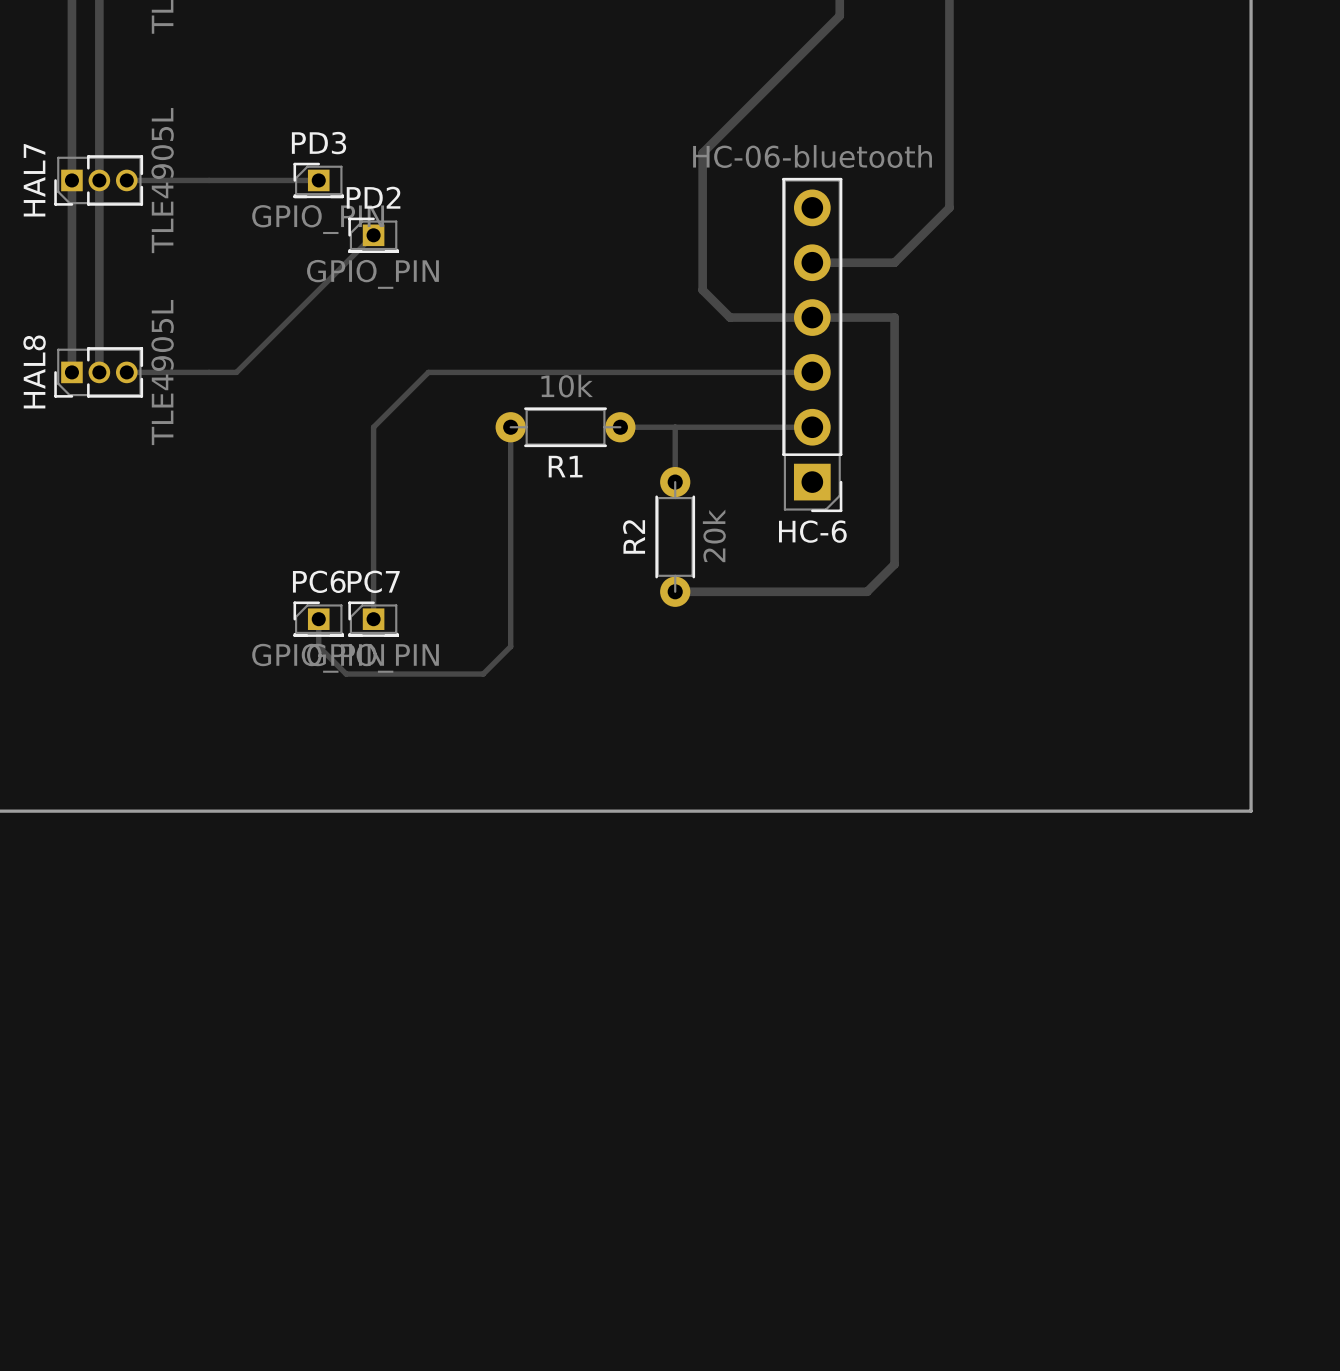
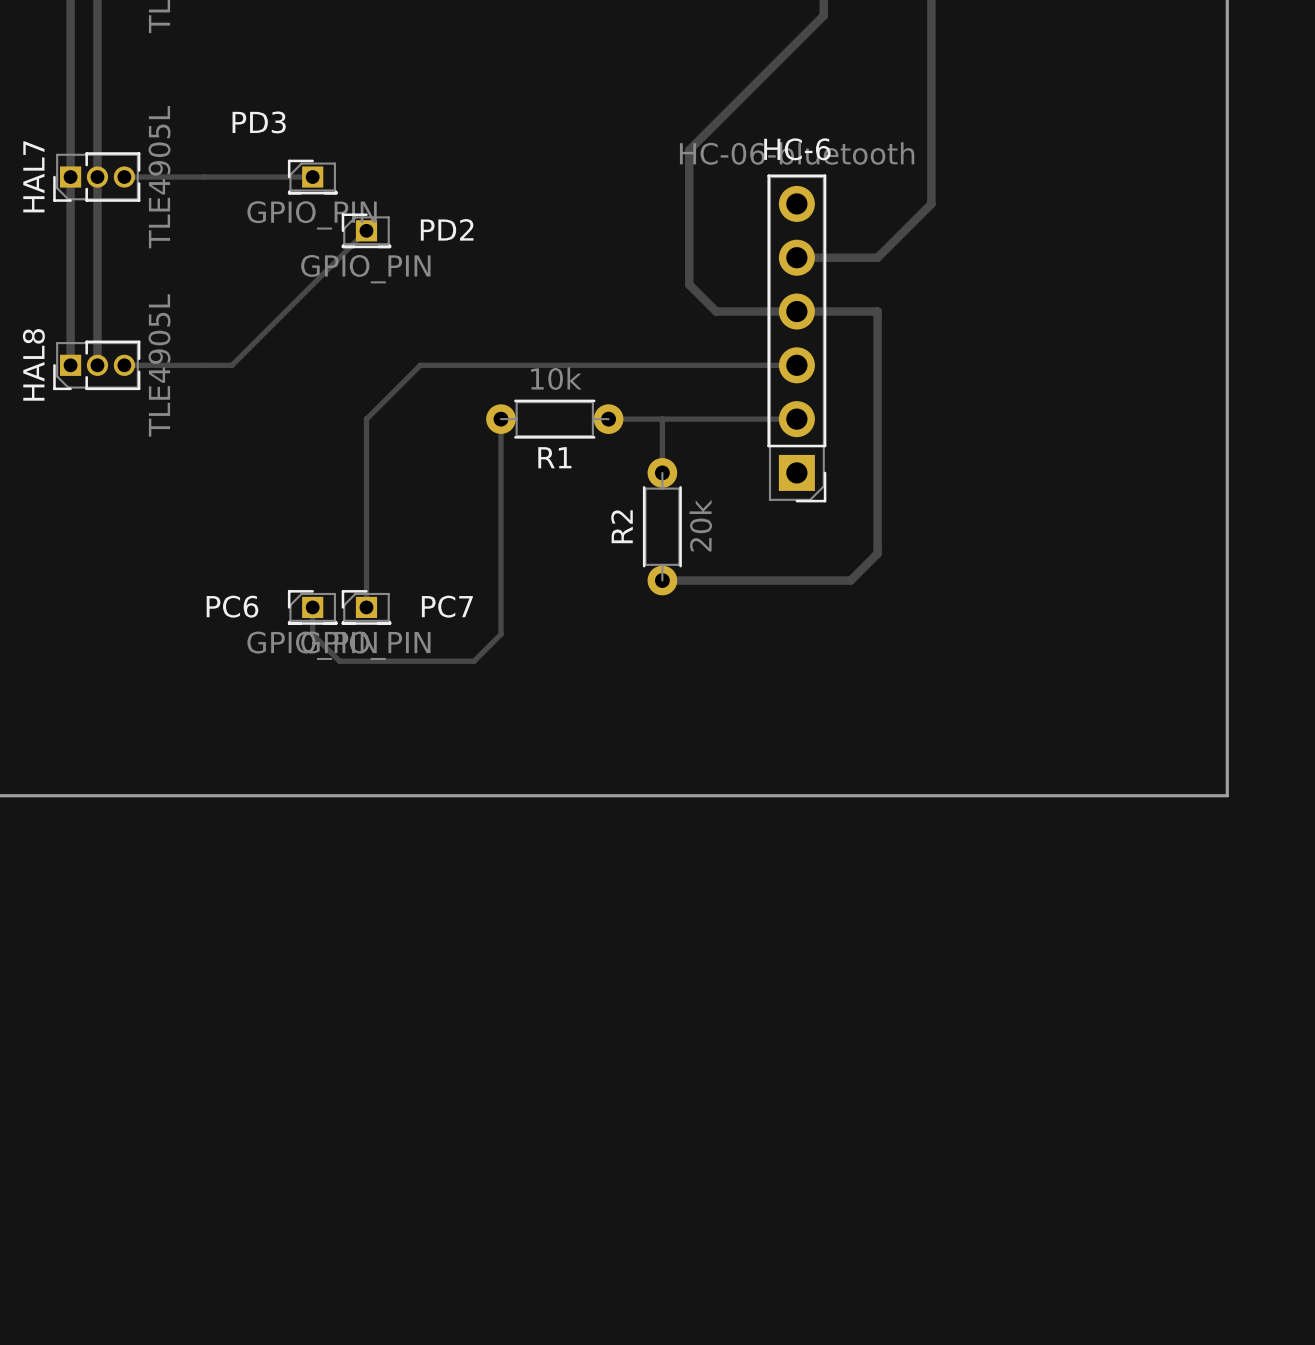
PD3 name position: PD3 (319, 143) -> PD3 (259, 122)
PD2 name position: PD2 (373, 197) -> PD2 (447, 229)
HC-6 name position: HC-6 (812, 531) -> HC-6 (797, 149)
PC6 name position: PC6 (319, 581) -> PC6 (232, 606)
PC7 name position: PC7 (373, 581) -> PC7 (447, 606)

